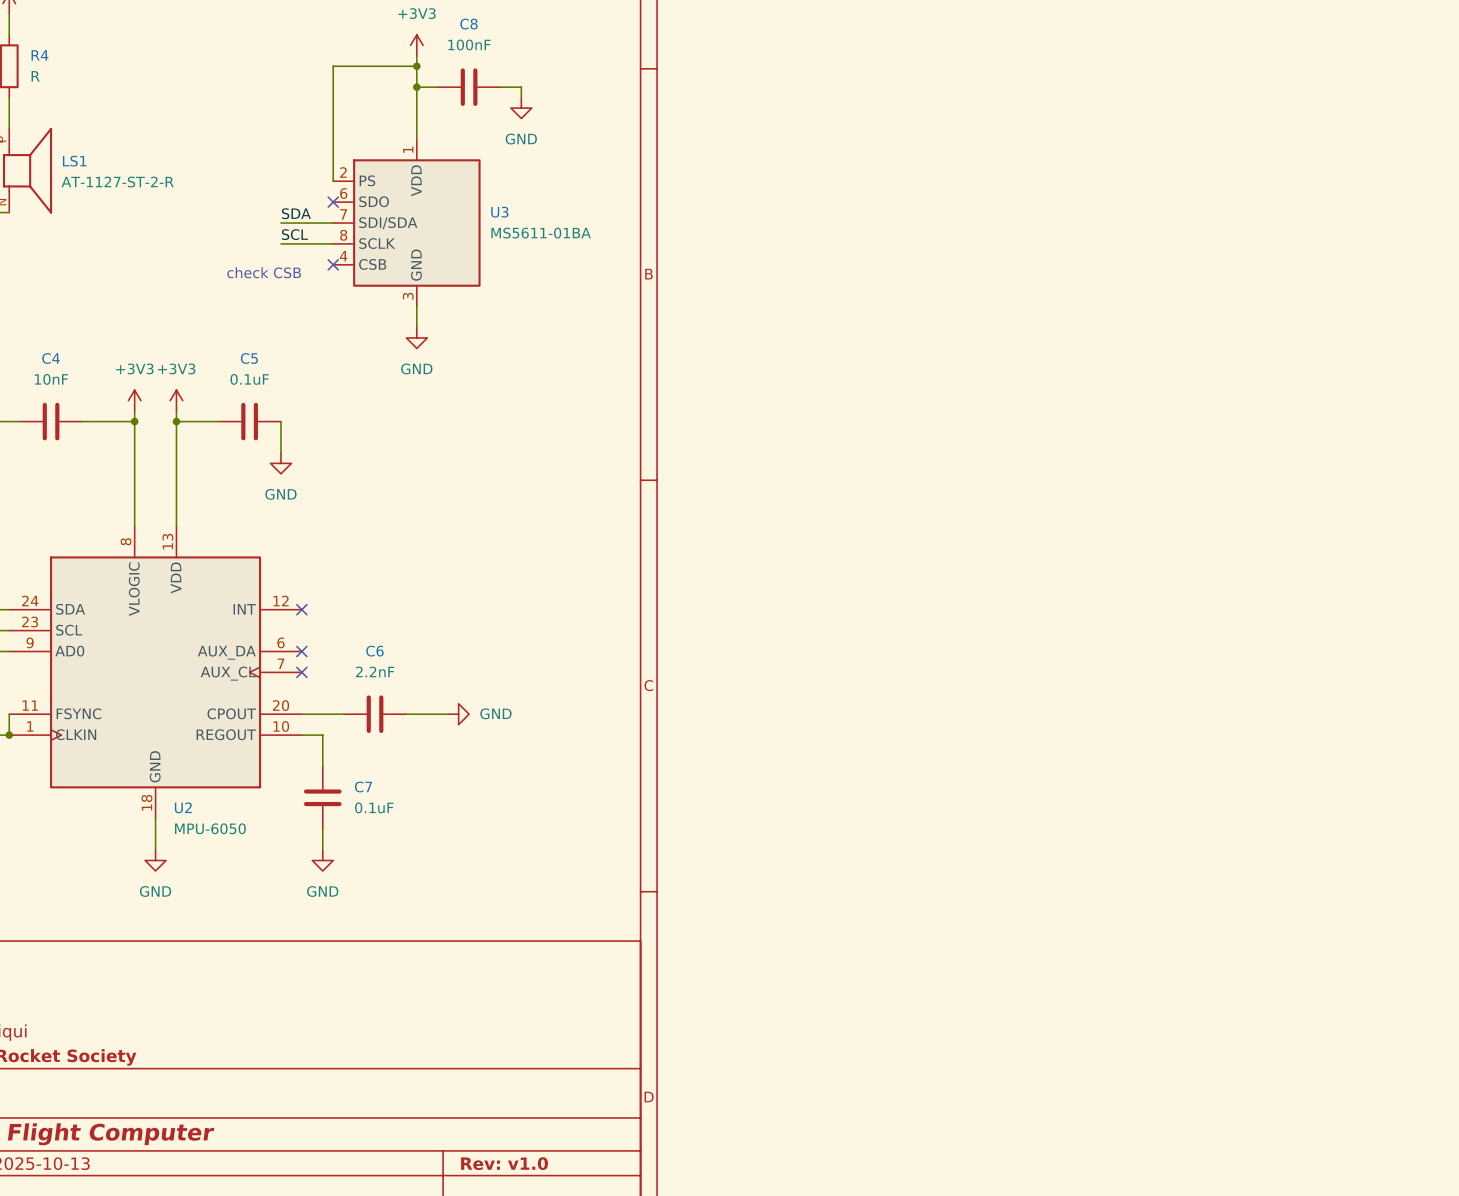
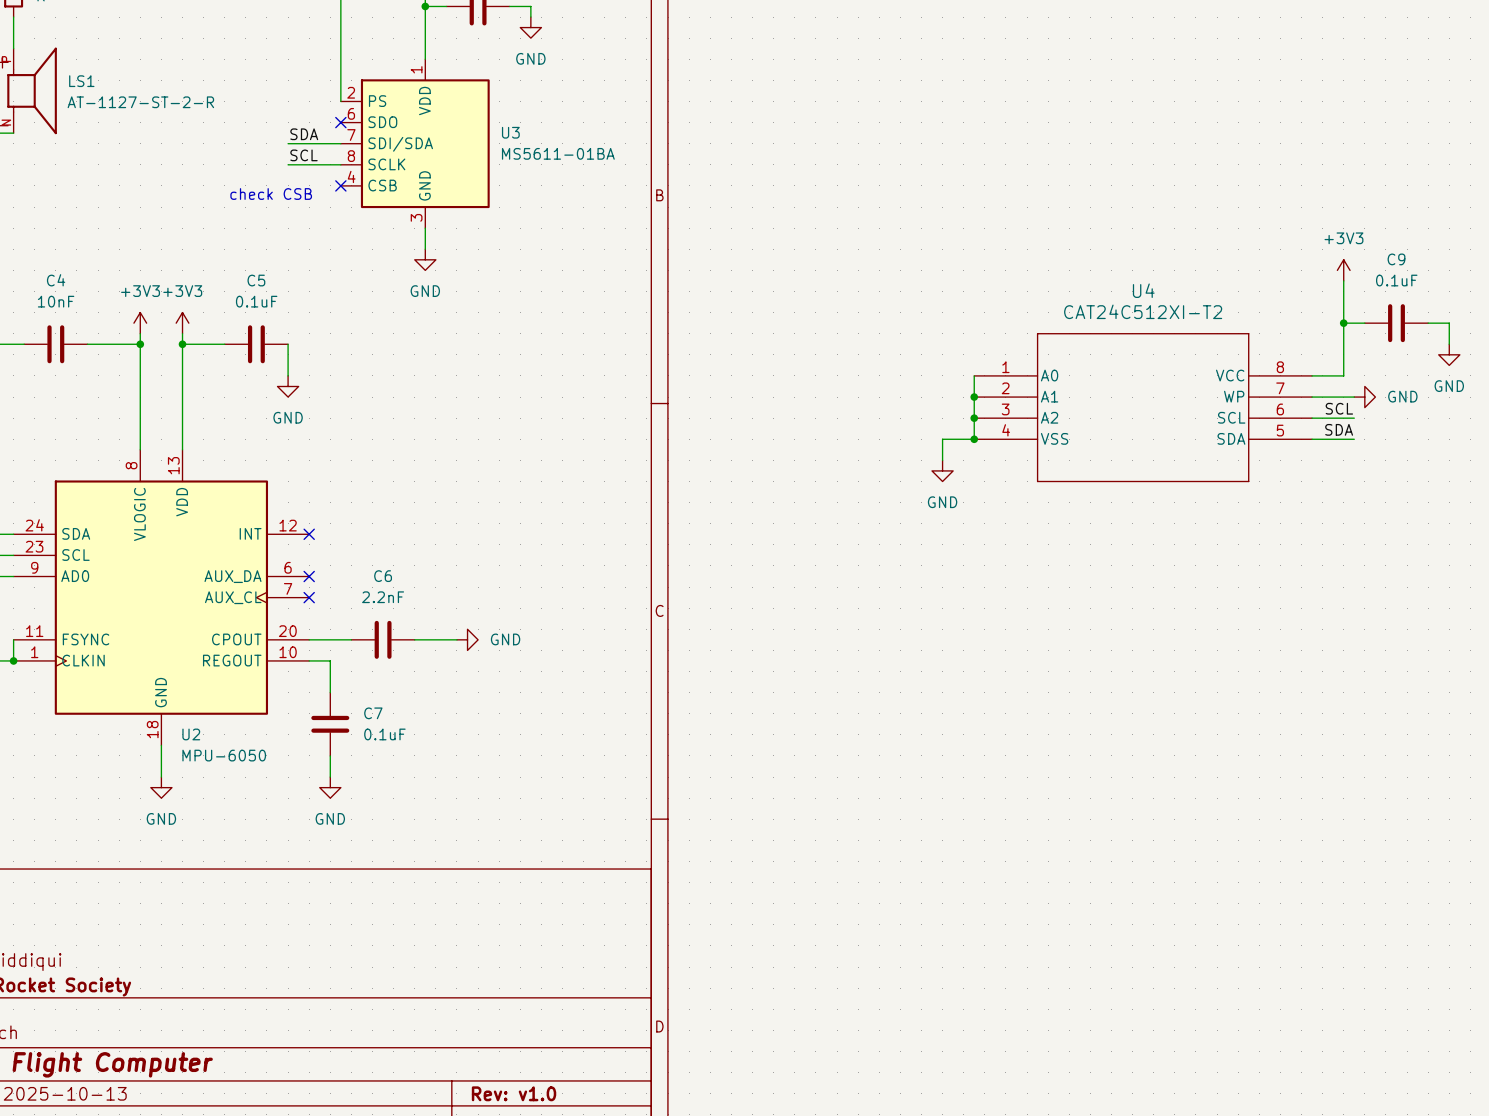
power symbol: none -> +3V3 (1343, 270)
wire: none -> (1343, 280) (1343, 375) (1312, 375)
wire: none -> (1343, 323) (1364, 323)
junction: none -> (1343, 323)
C9: none -> 0.1uF (1396, 323)
wire: none -> (1428, 323) (1449, 323) (1449, 344)
power symbol: none -> GND (1449, 354)
wire: none -> (974, 375) (974, 439) (942, 439) (942, 460)
junction: none -> (974, 397)
wire: none -> (1312, 397) (1354, 397)
power symbol: none -> GND (1364, 397)
U4: none -> CAT24C512XI-T2 (1143, 407)
label: none -> SCL (1339, 408)
junction: none -> (974, 418)
wire: none -> (1312, 418) (1354, 418)
label: none -> SDA (1339, 429)
junction: none -> (974, 439)
wire: none -> (1312, 439) (1354, 439)
power symbol: none -> GND (942, 470)

